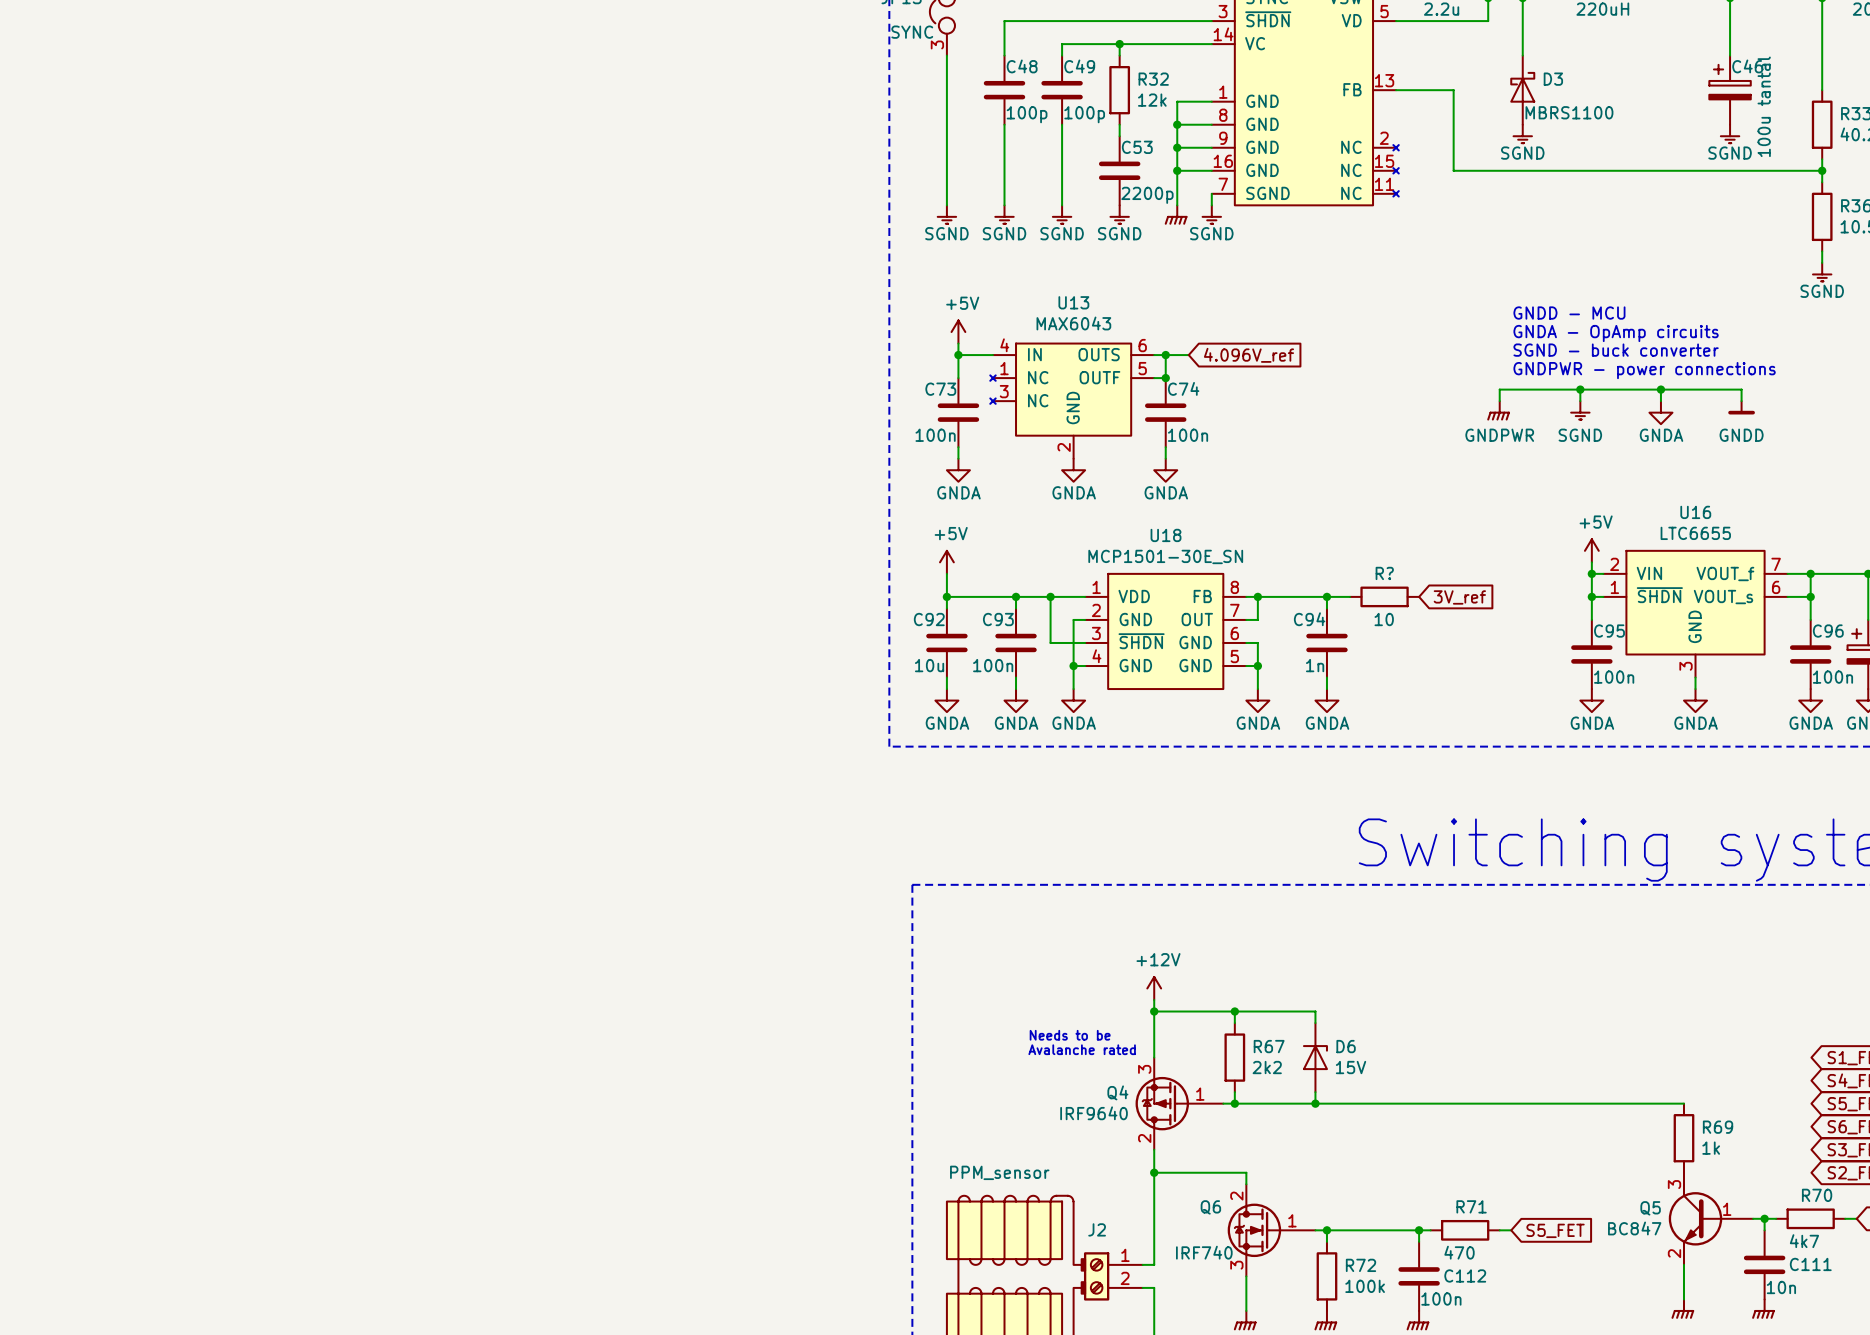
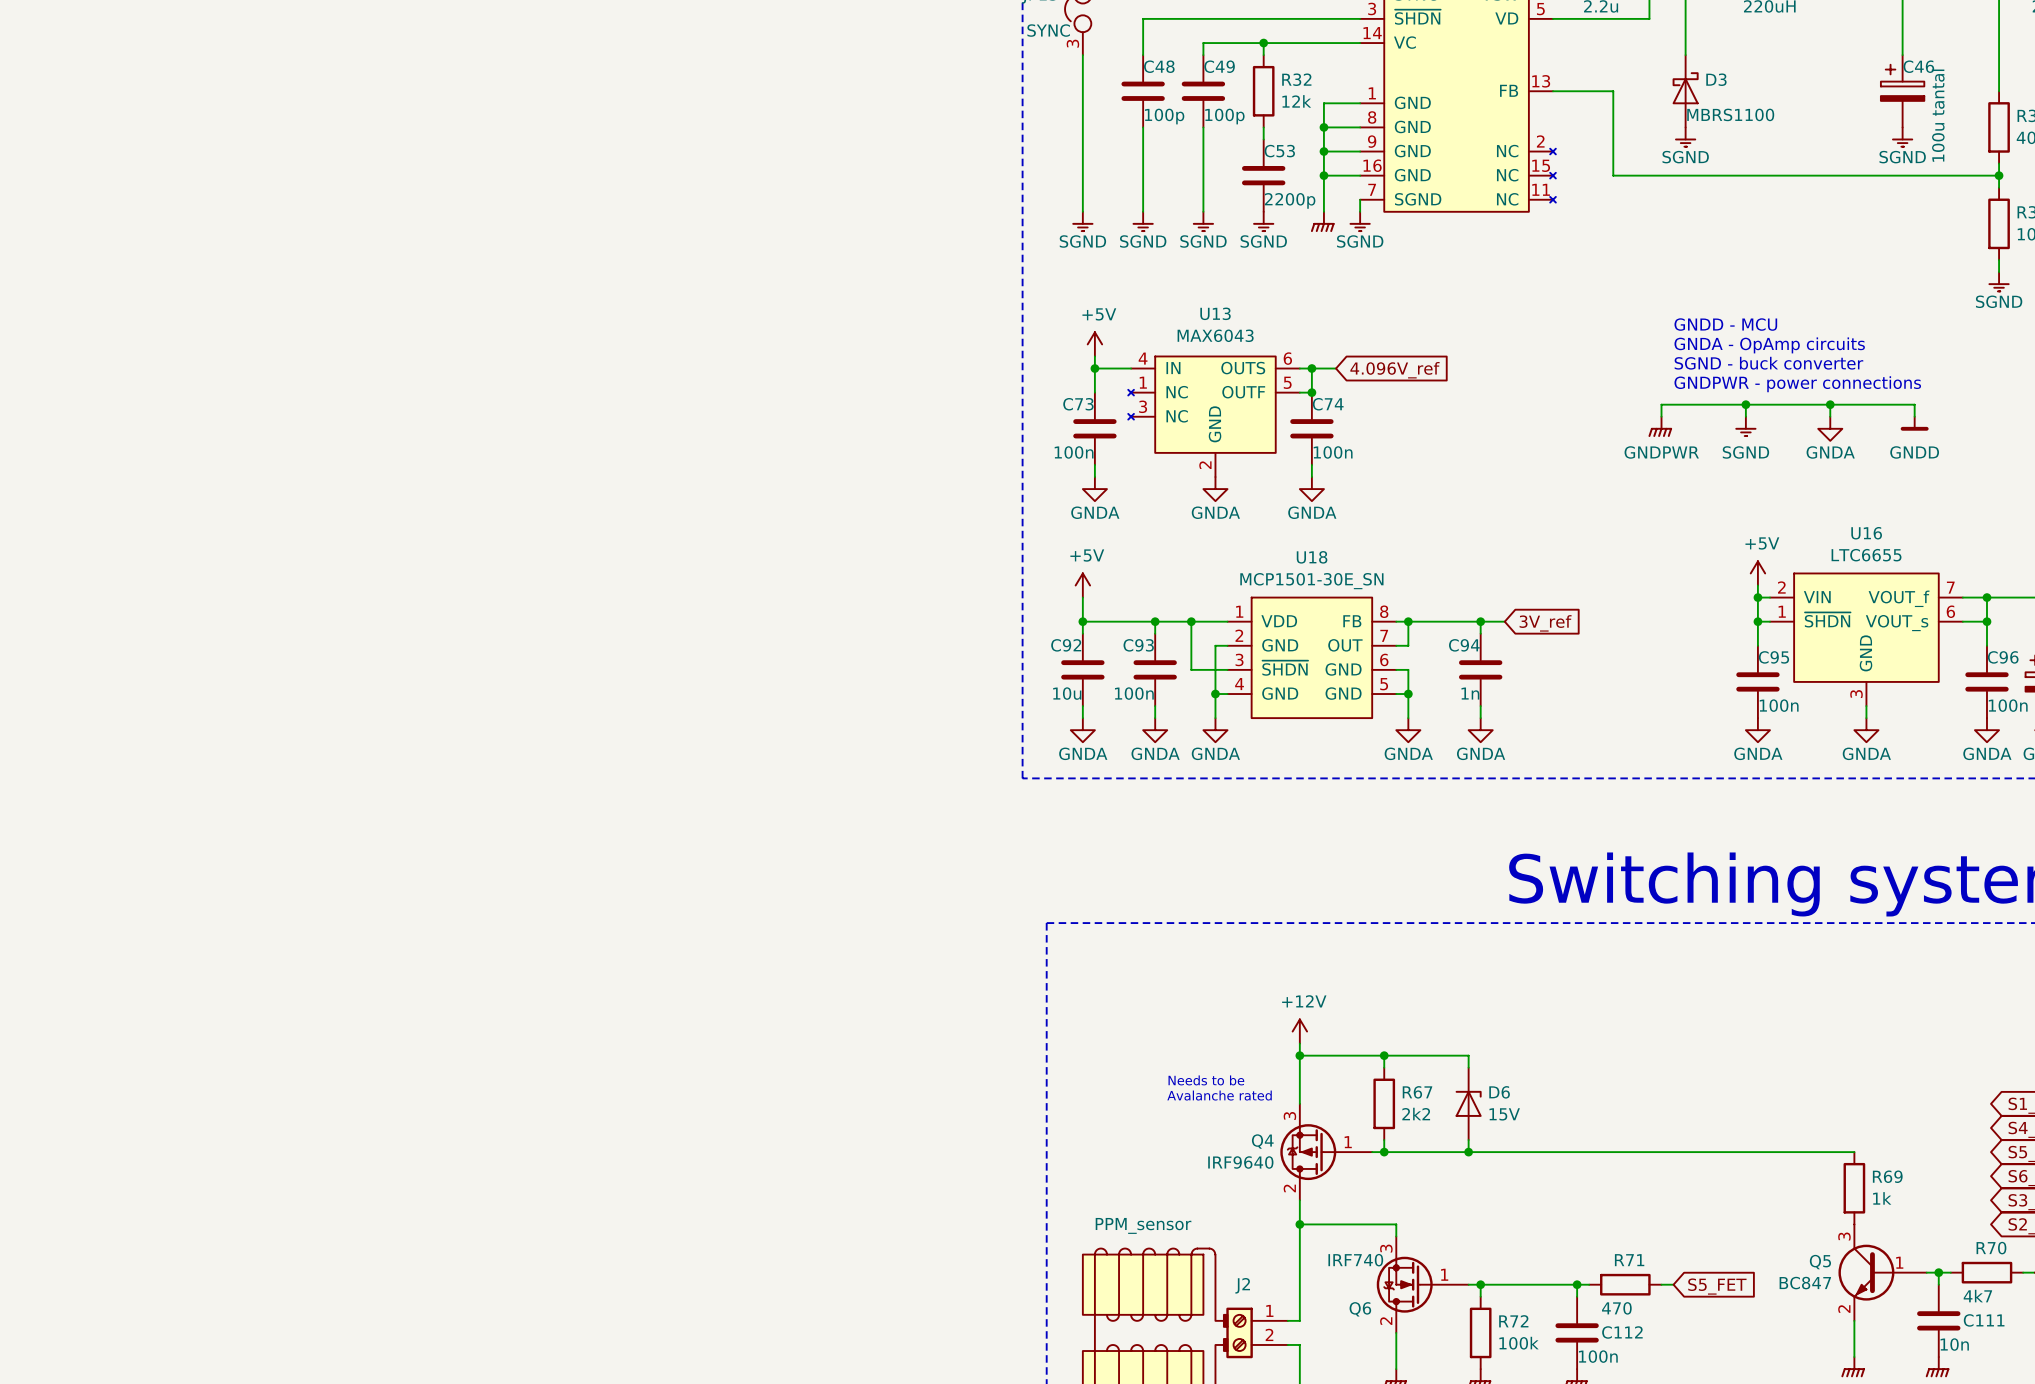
R?: 10 (1384, 596) -> none
global label position: 3V_ref (1459, 597) -> 3V_ref (1545, 623)
Q6 flip: as is (1254, 1230) -> up-down (1404, 1284)

